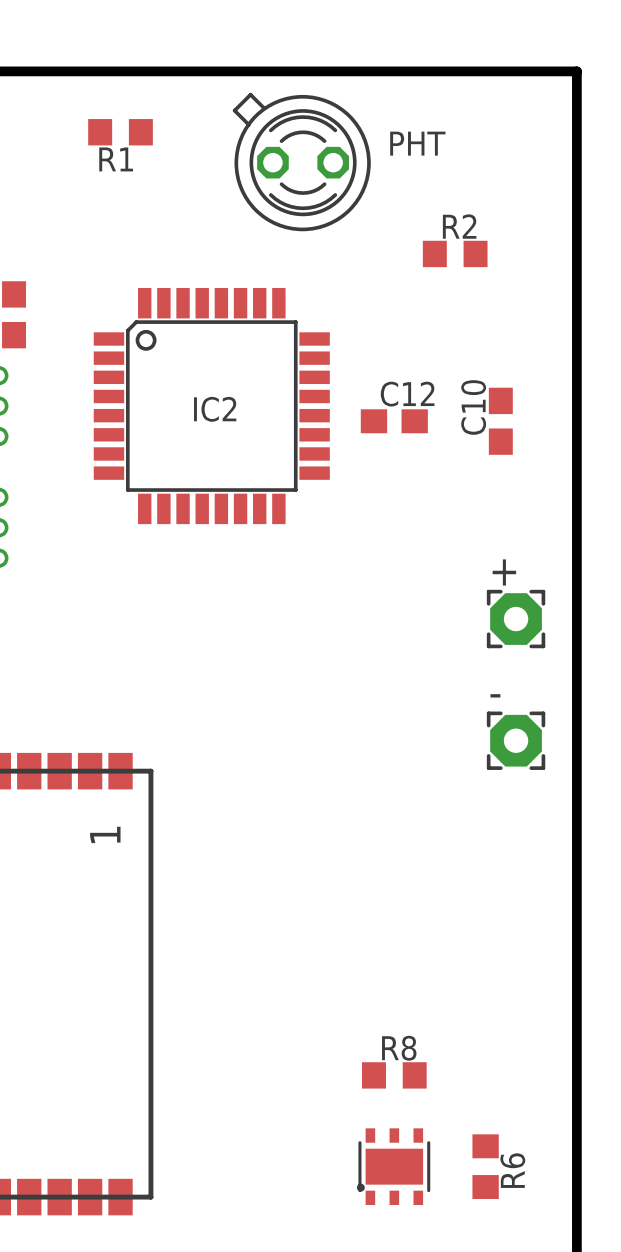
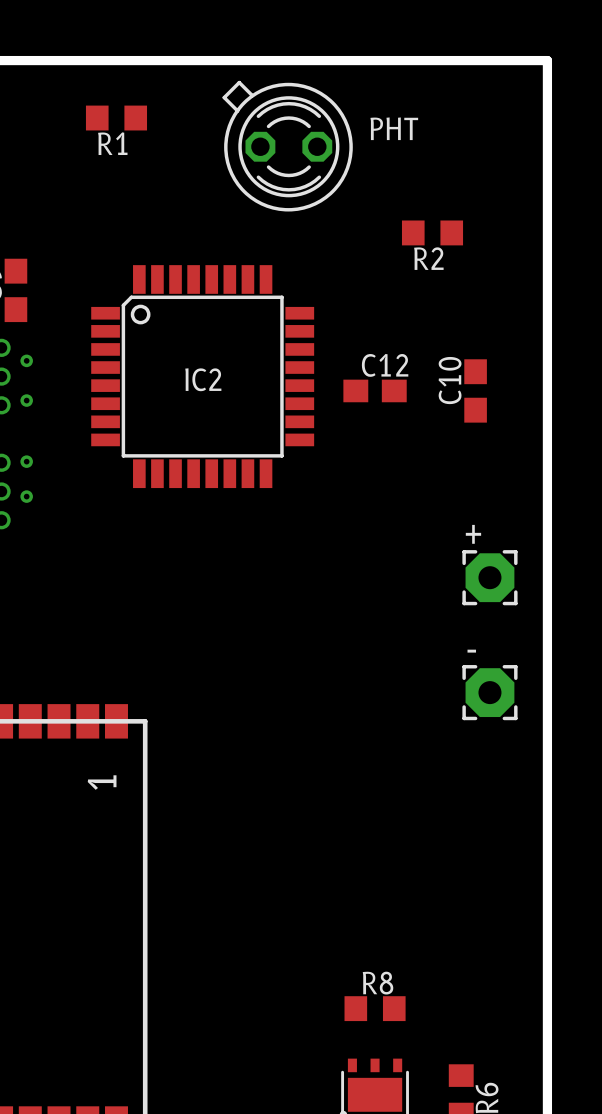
R2 name position: R2 (459, 226) -> R2 (428, 258)
via: none -> (26, 360)
via: none -> (26, 400)
via: none -> (26, 461)
via: none -> (26, 496)

